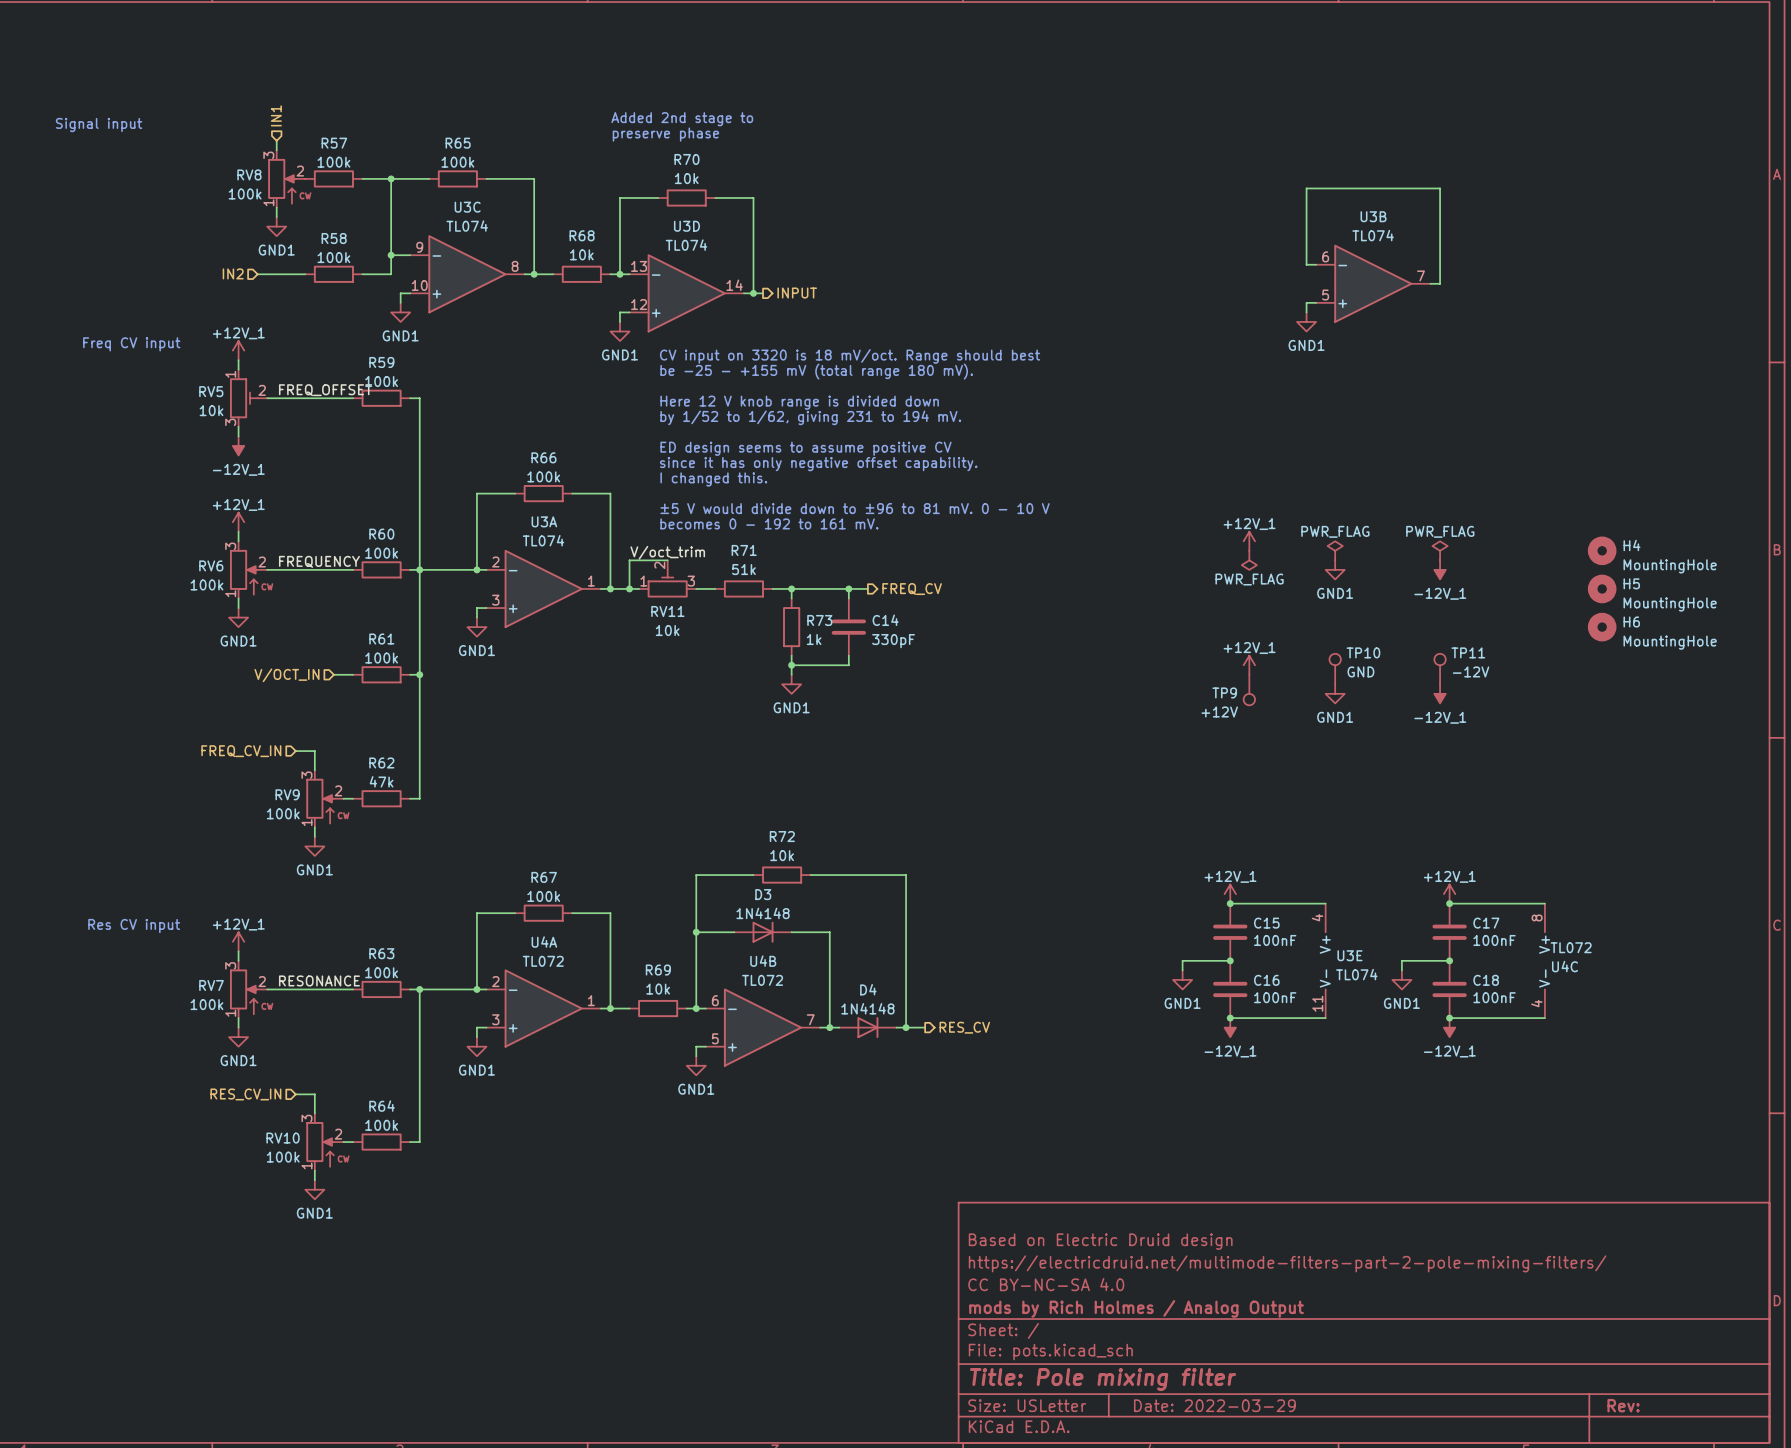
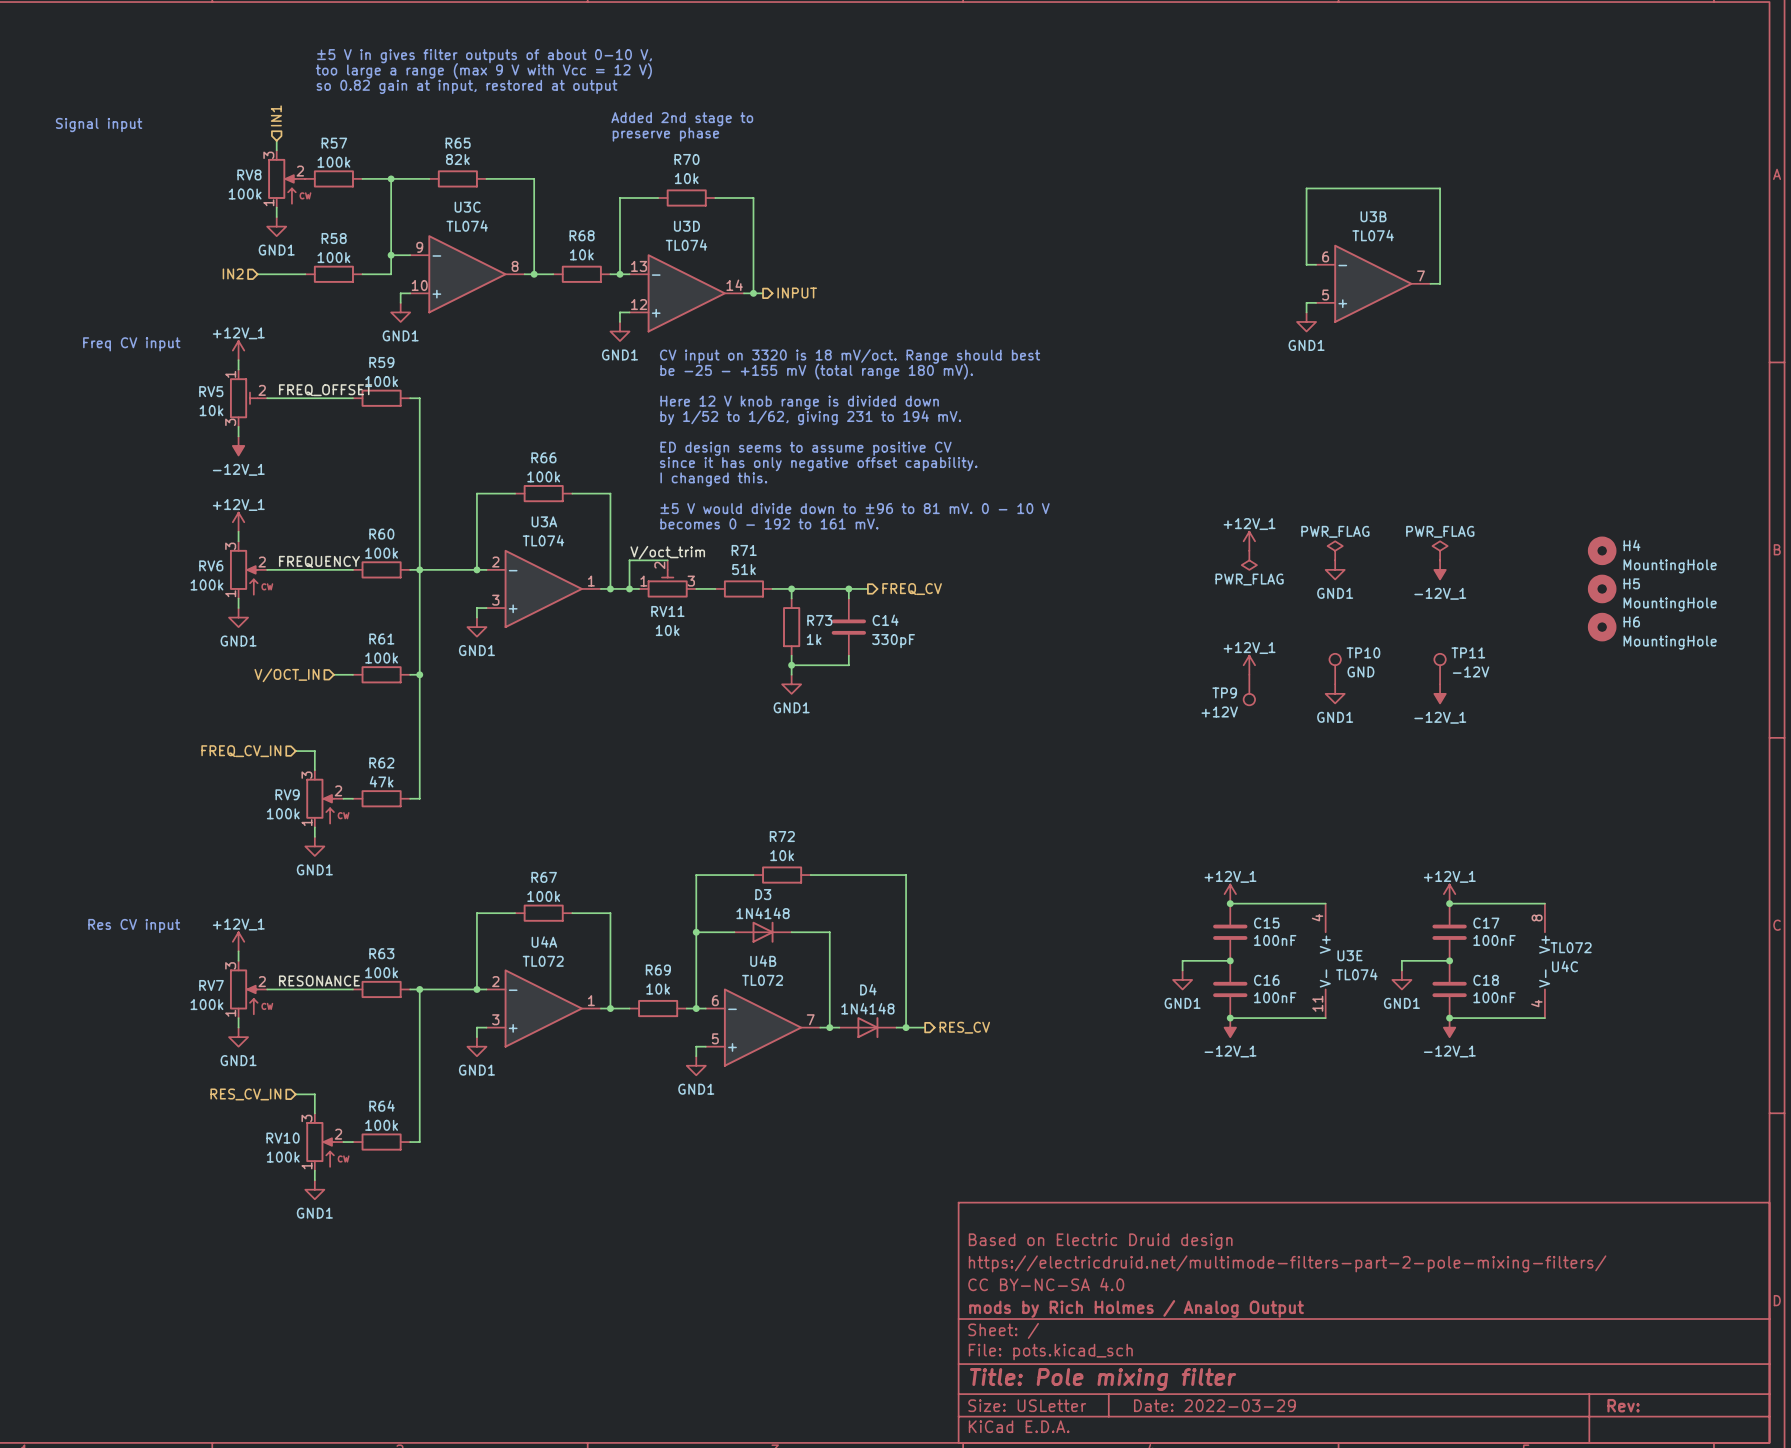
text: none -> ±5 V in gives filter outputs of about 0-10 V, (484, 56)
text: none -> too large a range (max 9 V with Vcc = 12 V) (483, 71)
text: none -> so 0.82 gain at input, restored at output (467, 86)
R65 value: 100k (457, 162) -> 82k (457, 159)

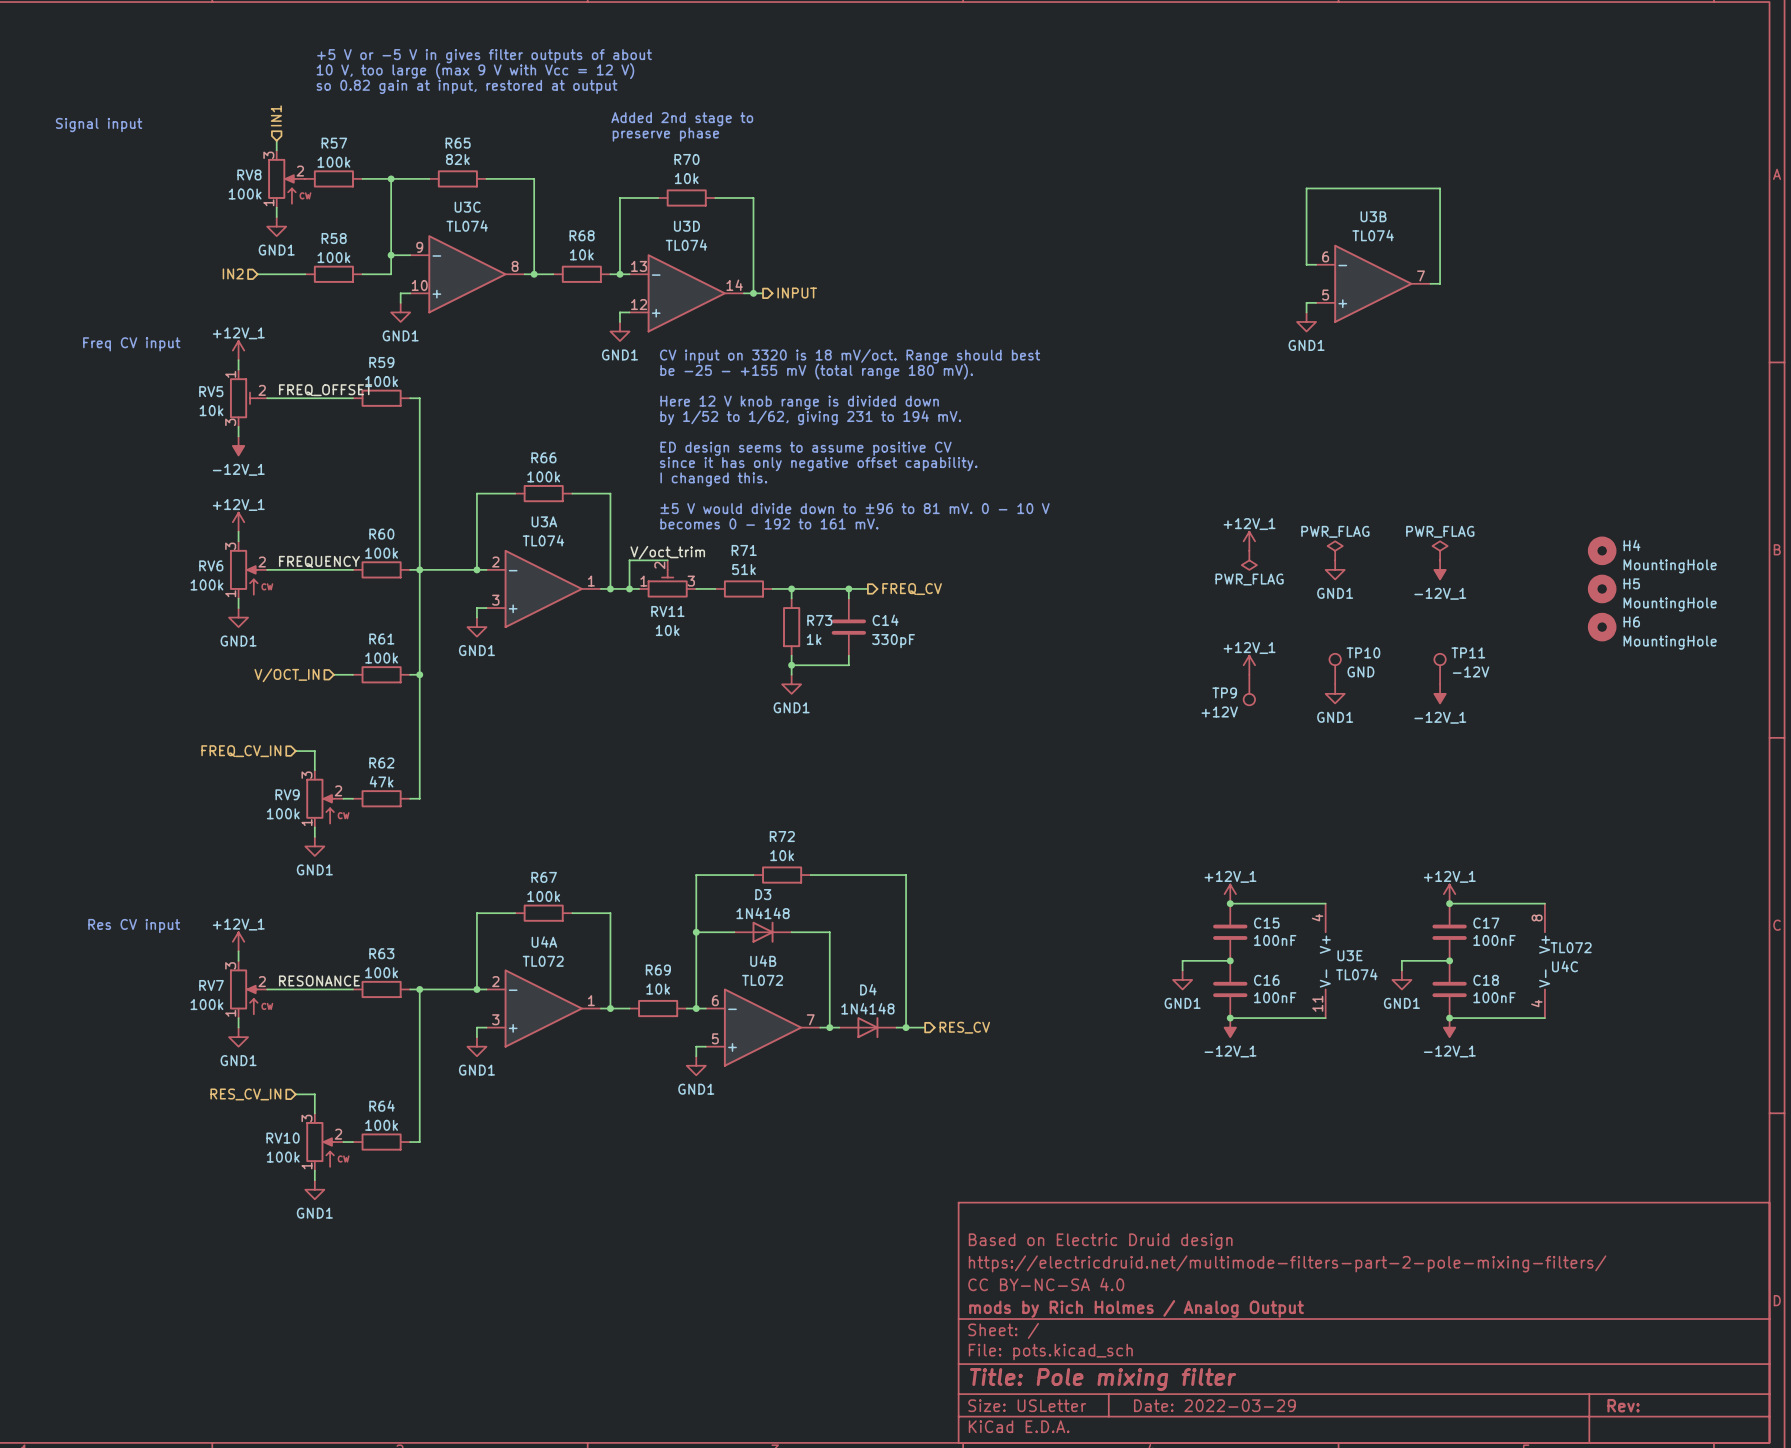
text: ±5 V in gives filter outputs of about 0-10 V, (484, 56) -> +5 V or -5 V in gives filter outputs of about (484, 56)
text: too large a range (max 9 V with Vcc = 12 V) (483, 71) -> 10 V, too large (max 9 V with Vcc = 12 V) (475, 71)

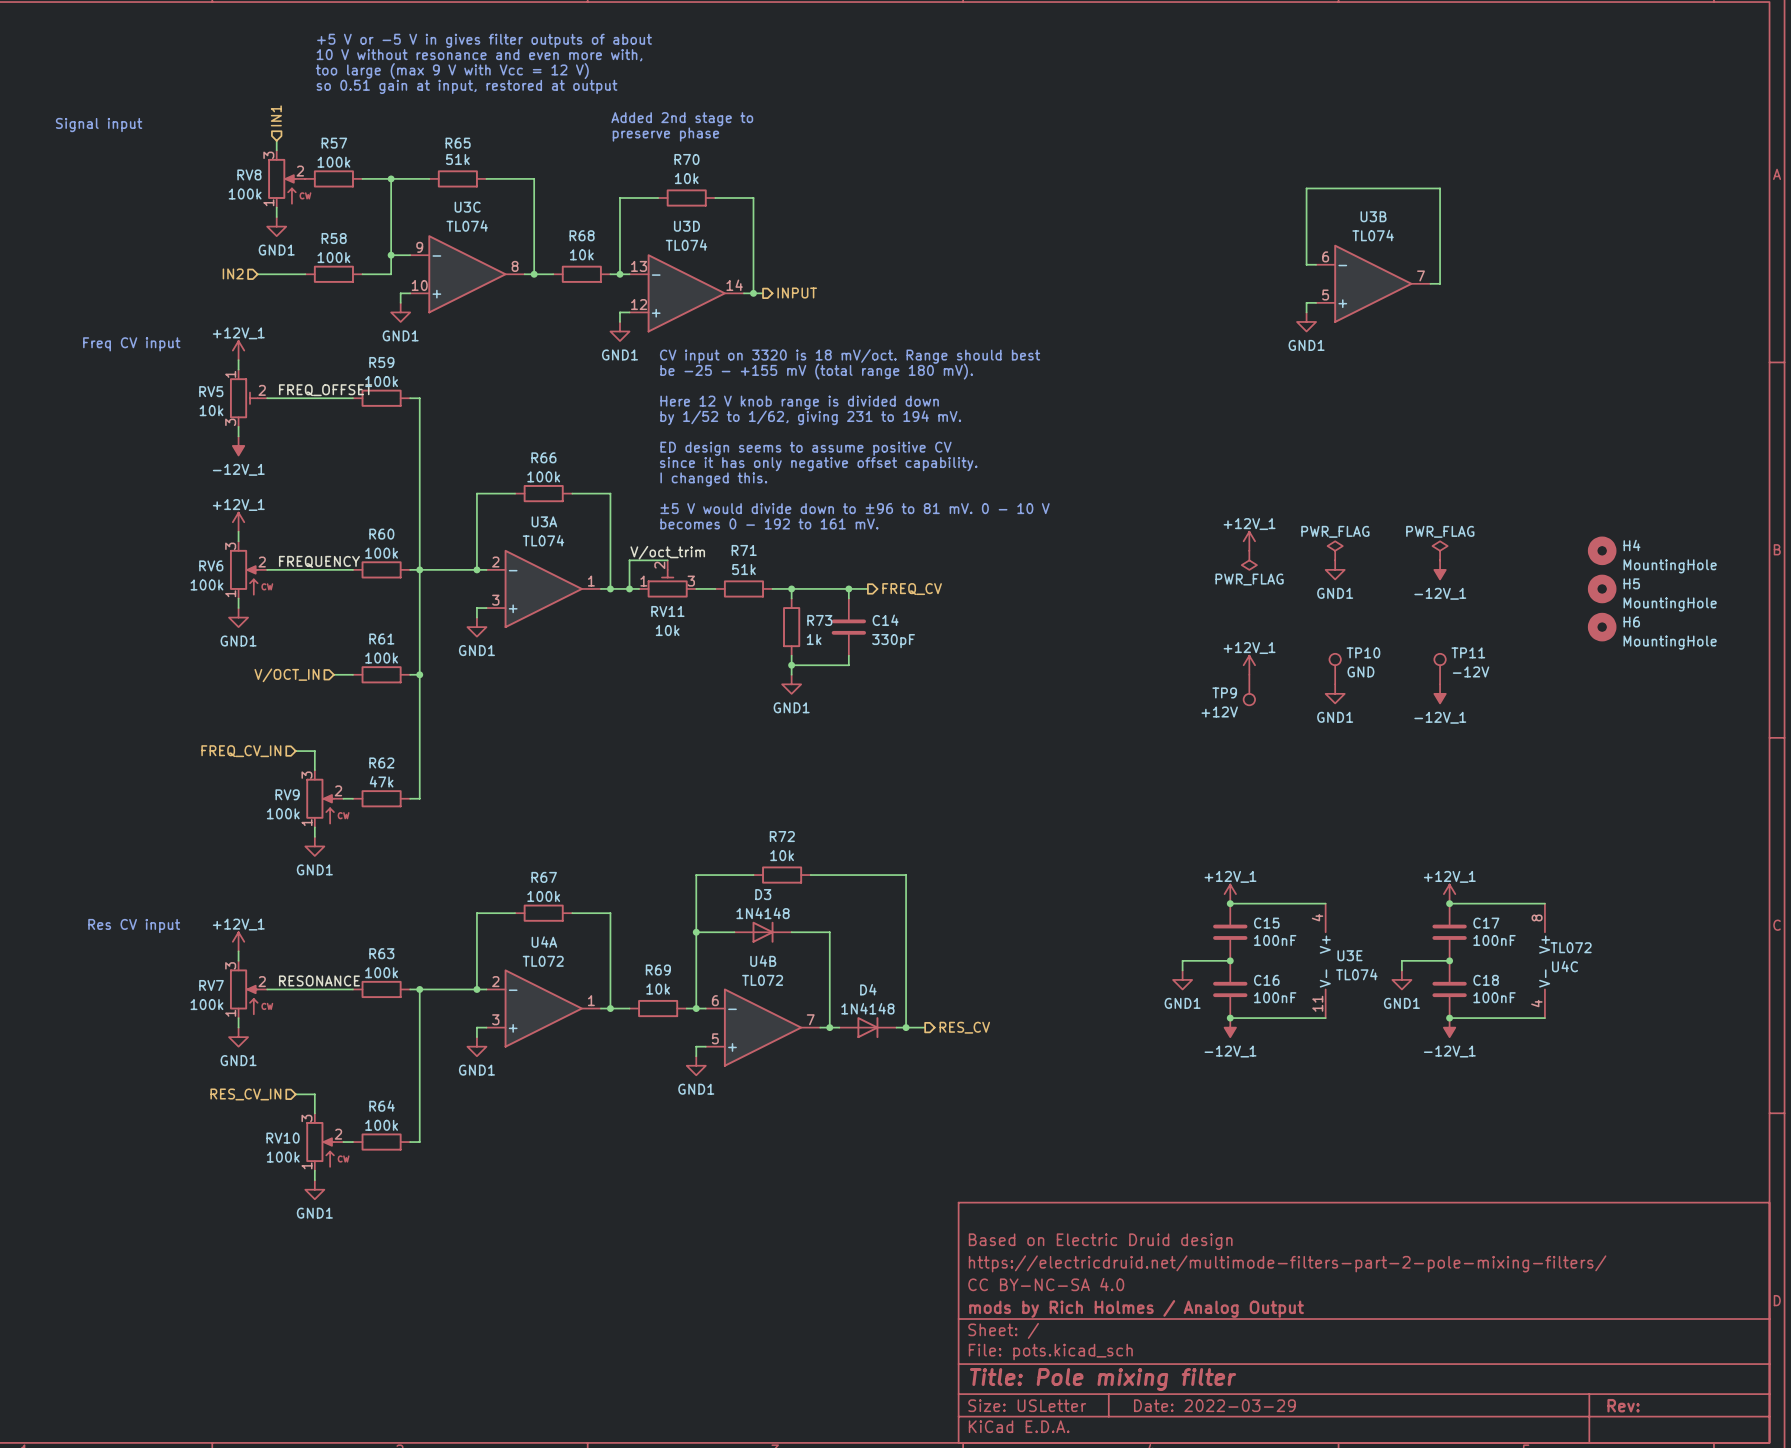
text: none -> +5 V or -5 V in gives filter outputs of about (484, 40)
text: +5 V or -5 V in gives filter outputs of about (484, 56) -> 10 V without resonance and even more with, (479, 55)
text: 10 V, too large (max 9 V with Vcc = 12 V) (475, 71) -> too large (max 9 V with Vcc = 12 V) (452, 71)
text: so 0.82 gain at input, restored at output (467, 86) -> so 0.51 gain at input, restored at output (467, 86)
R65 value: 82k (457, 159) -> 51k (457, 159)

